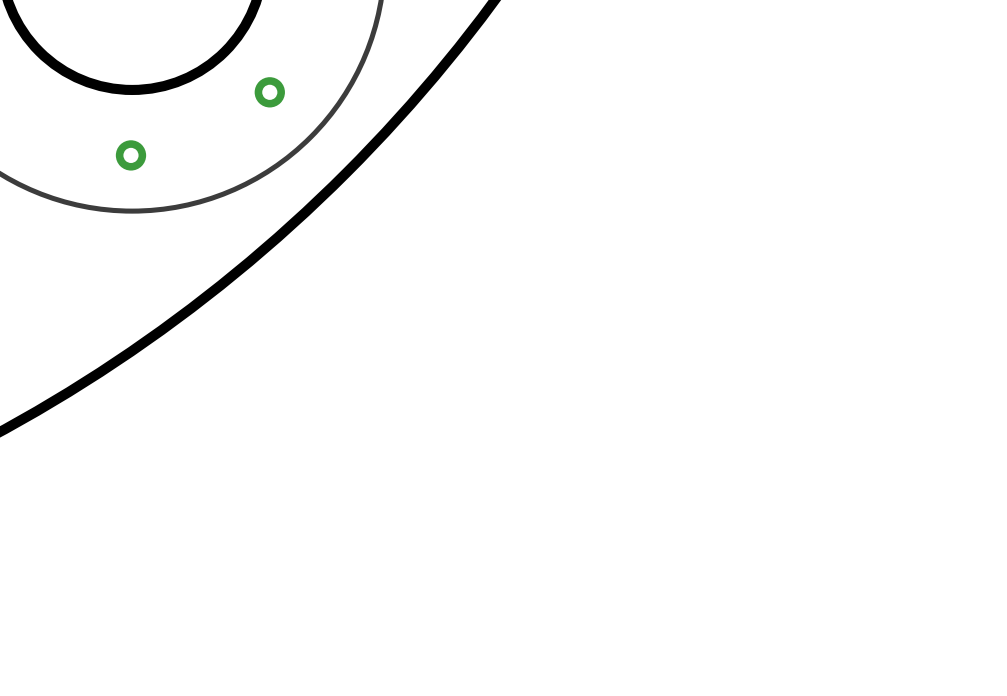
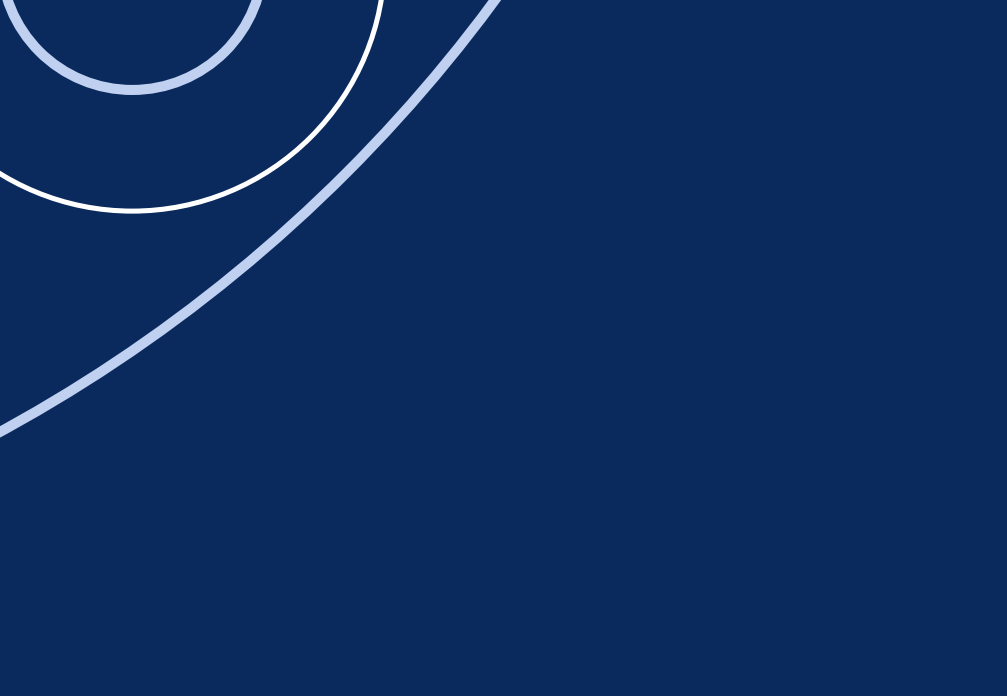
via: (269, 92) -> none
via: (130, 155) -> none

